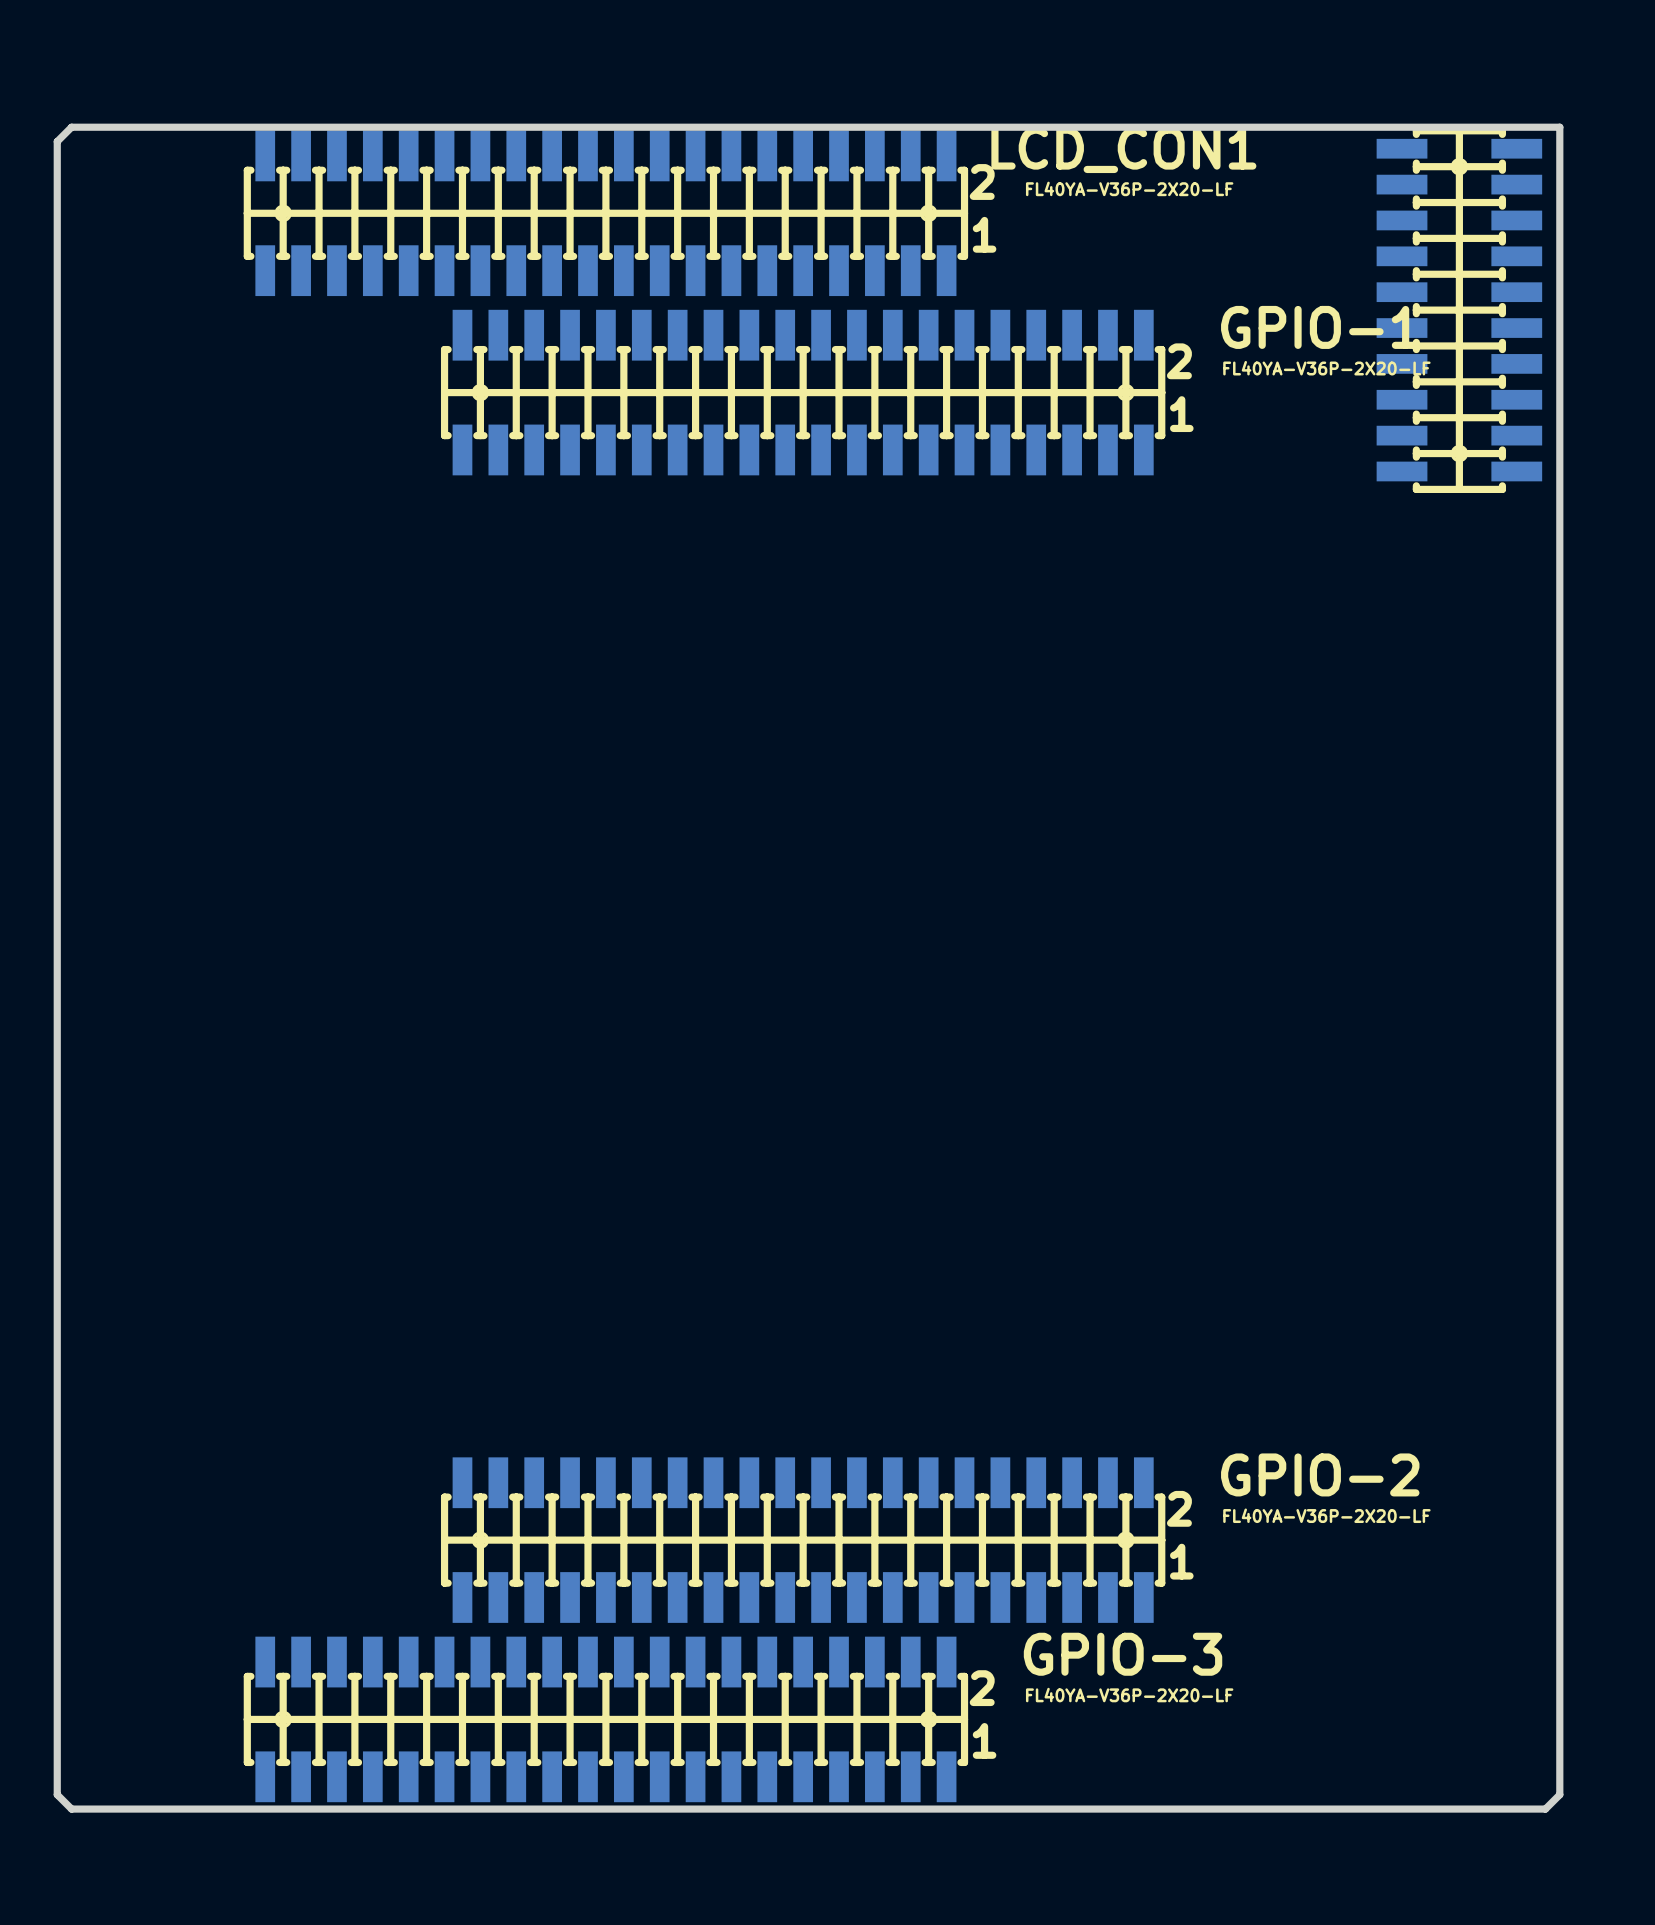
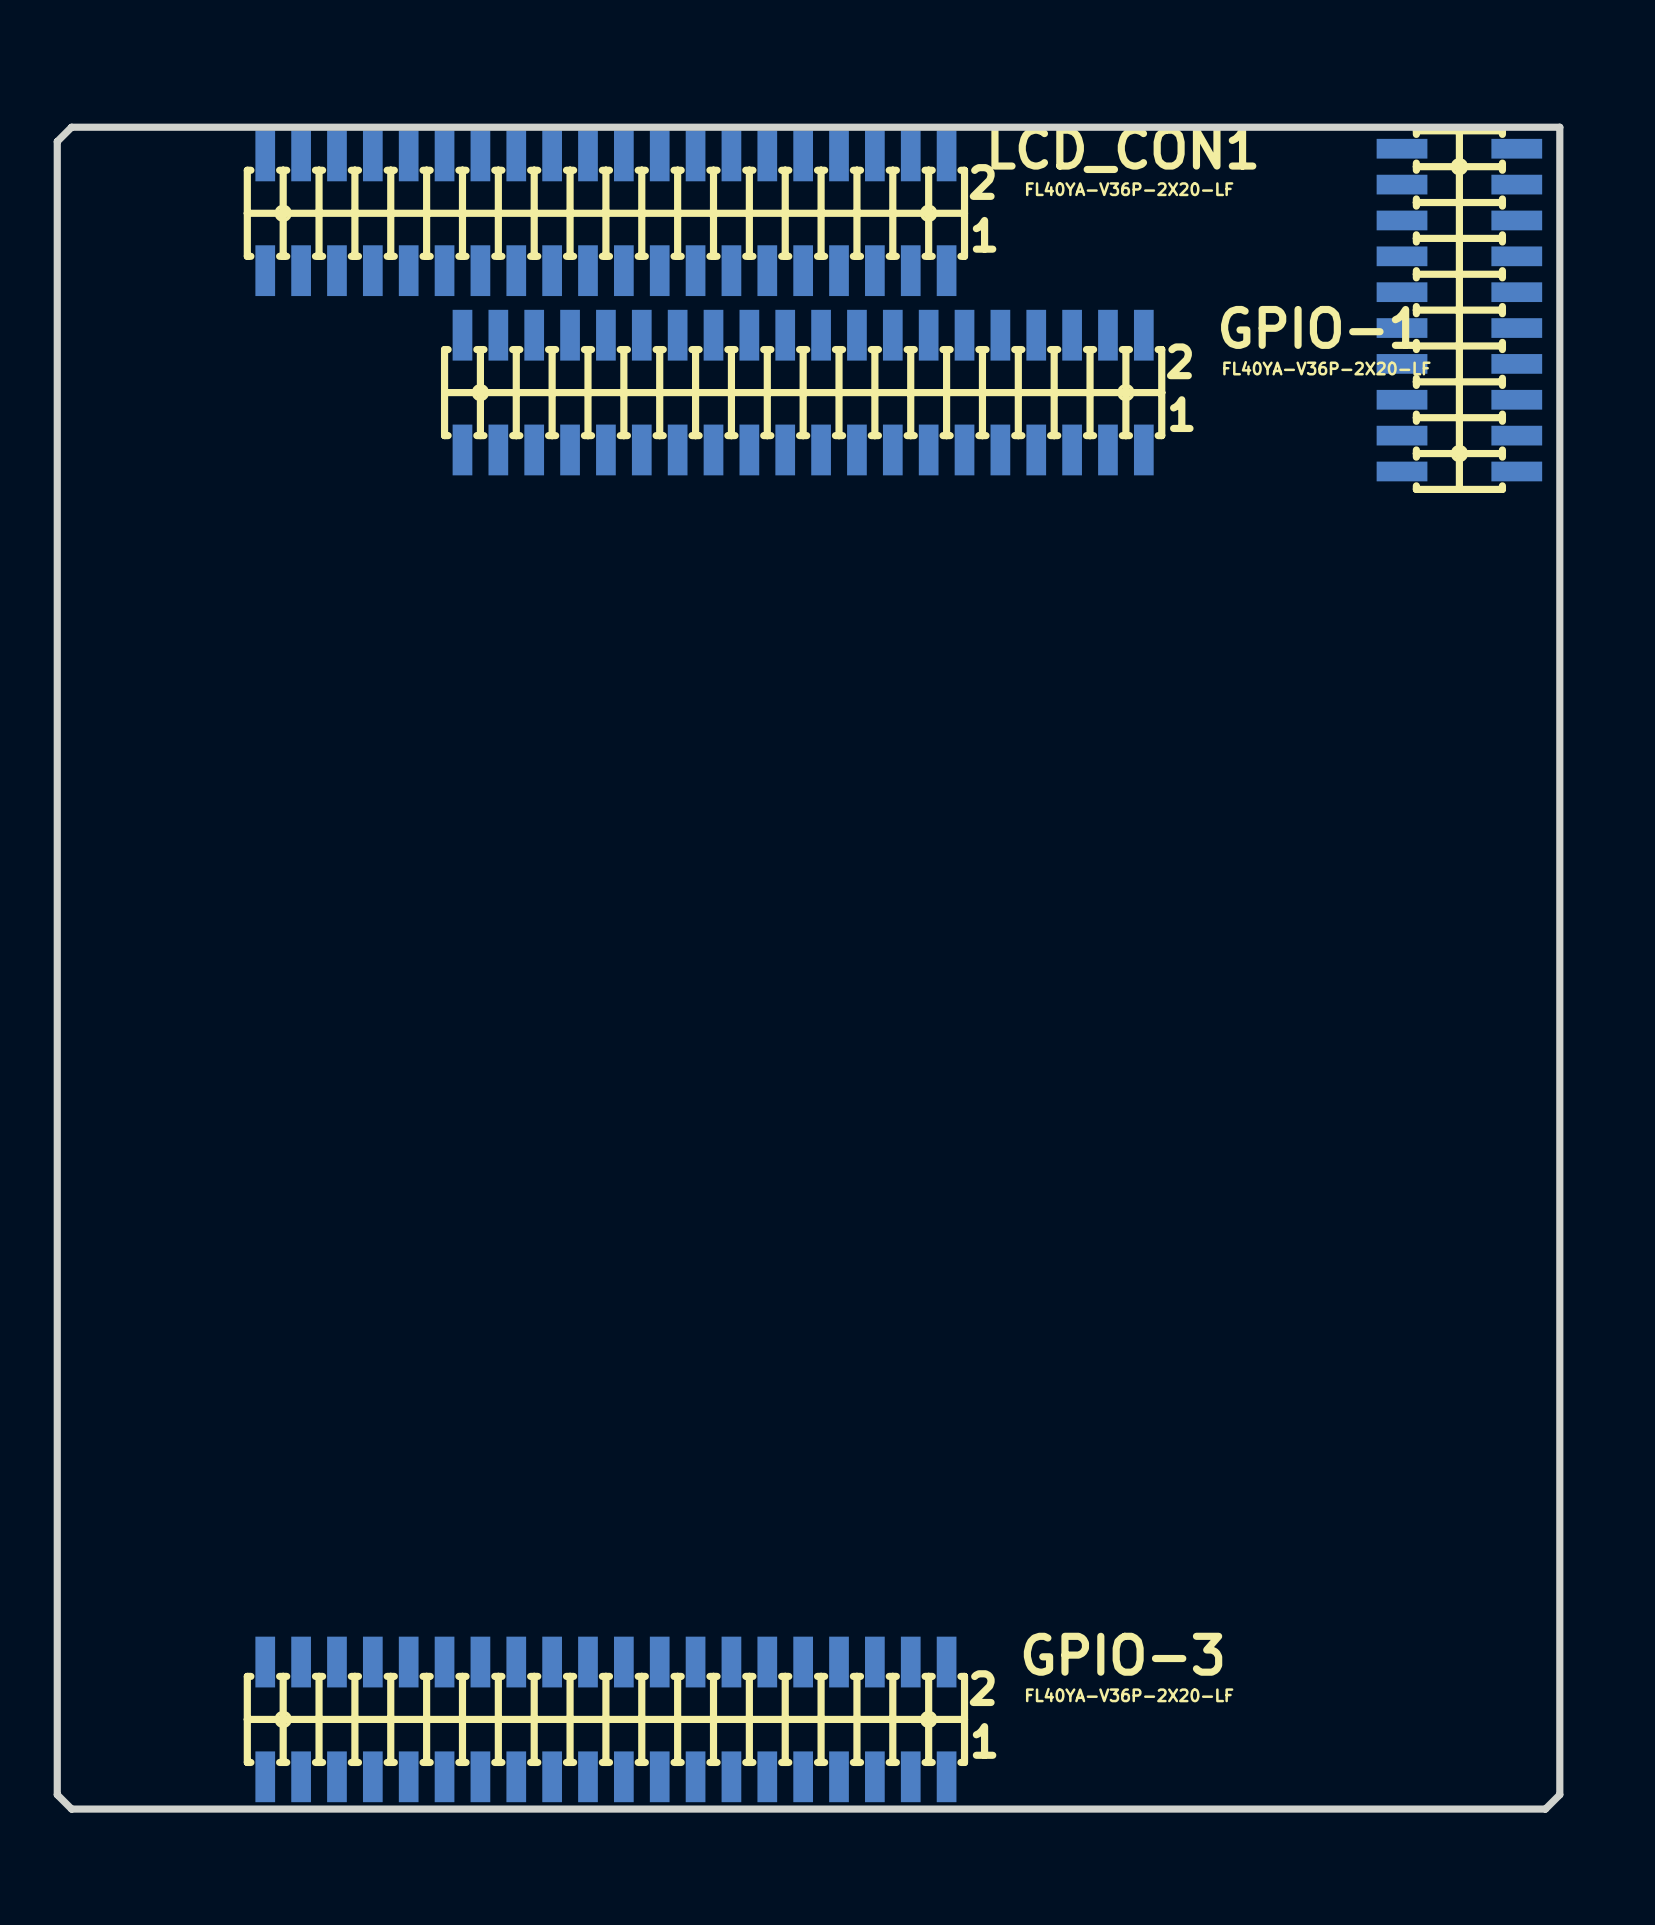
GPIO-2: FL40YA-V36P-2X20-LF (803, 1540) -> none

